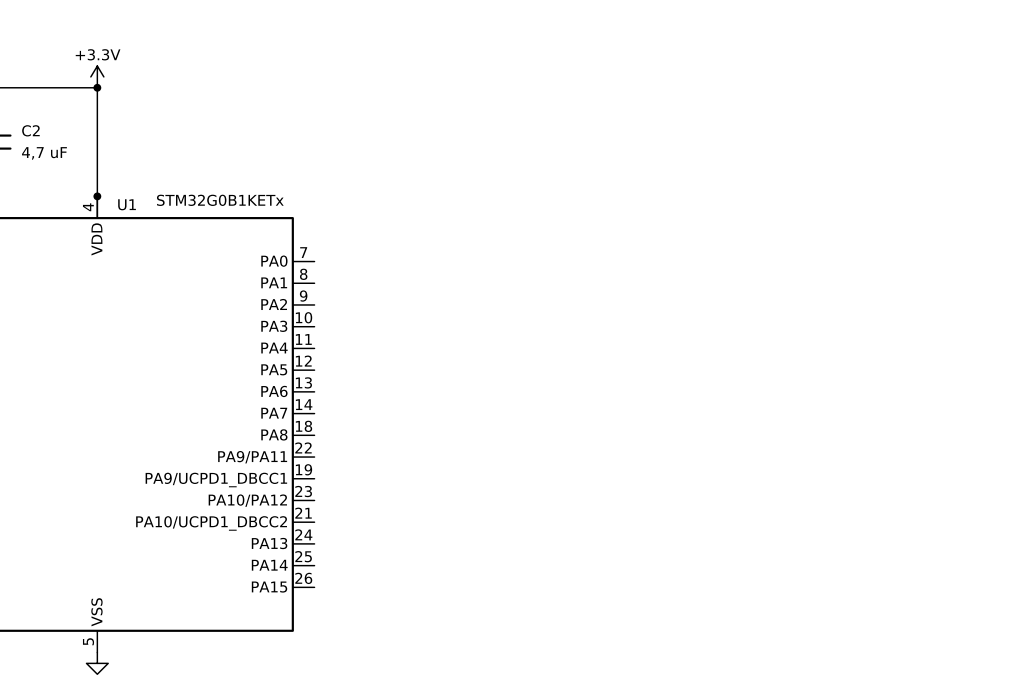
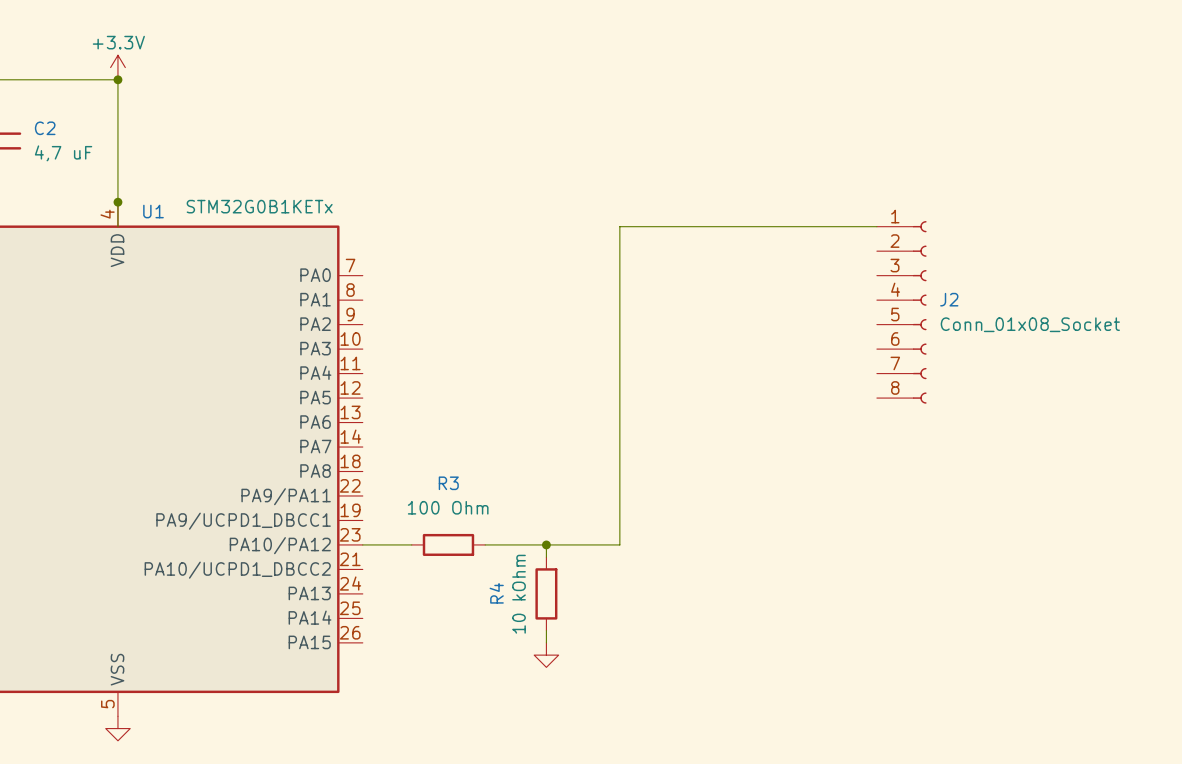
wire: none -> (876, 226) (619, 226) (619, 544) (485, 544)
J2: none -> Conn_01x08_Socket (901, 312)
wire: none -> (362, 544) (411, 544)
R3: none -> 100 Ohm (448, 544)
wire: none -> (546, 544) (546, 557)
junction: none -> (546, 544)
R4: none -> 10 kOhm (546, 593)
wire: none -> (546, 630) (546, 642)
power symbol: none -> (546, 655)

